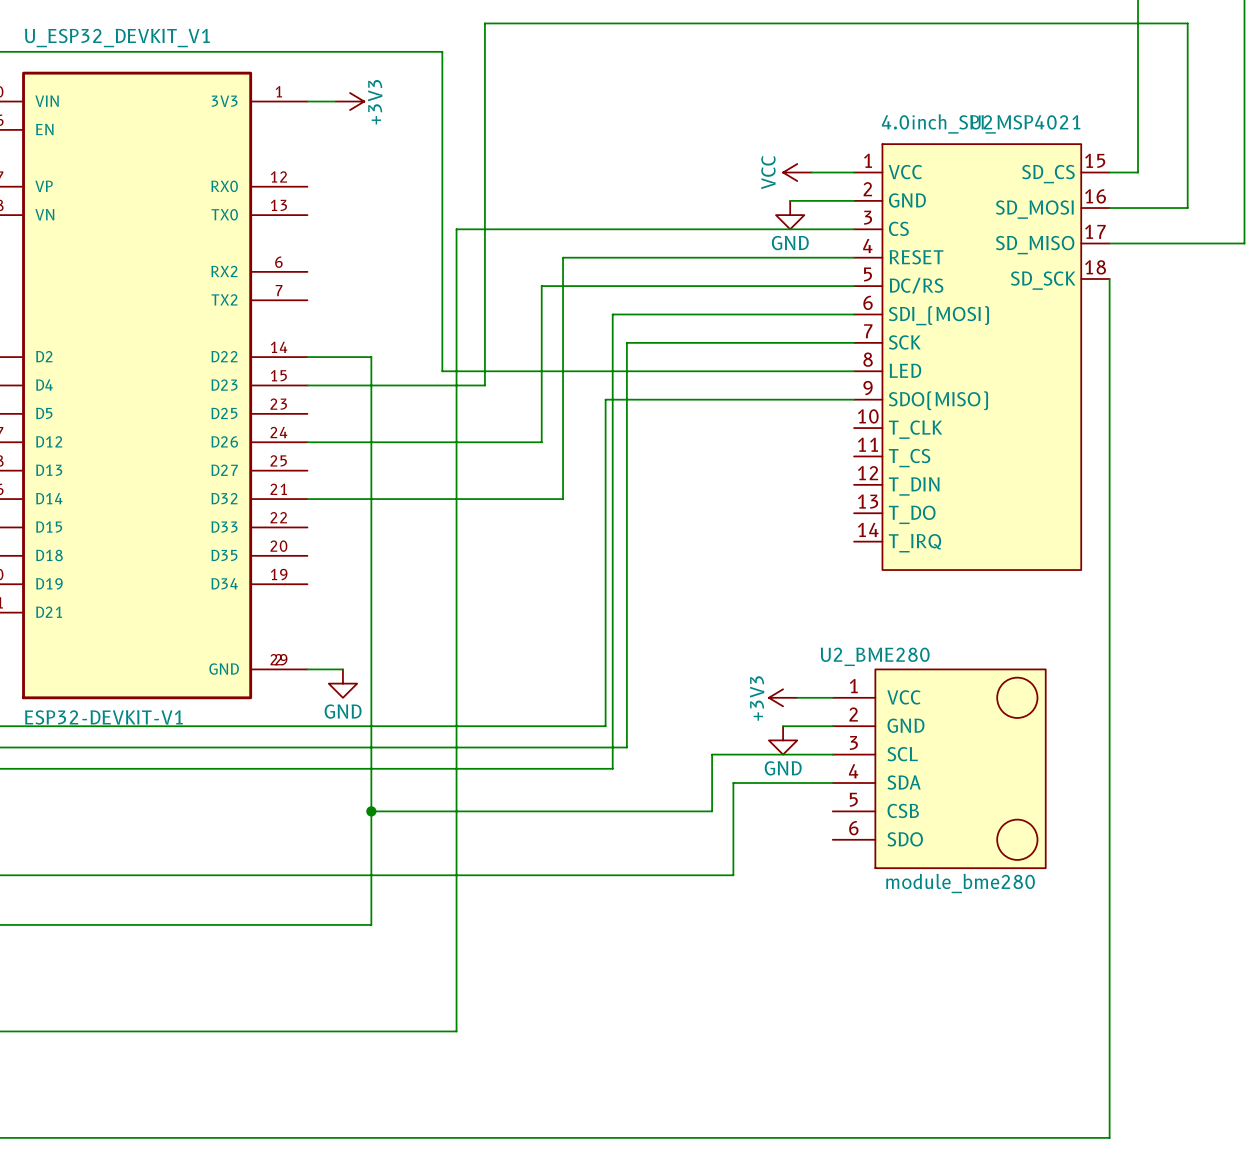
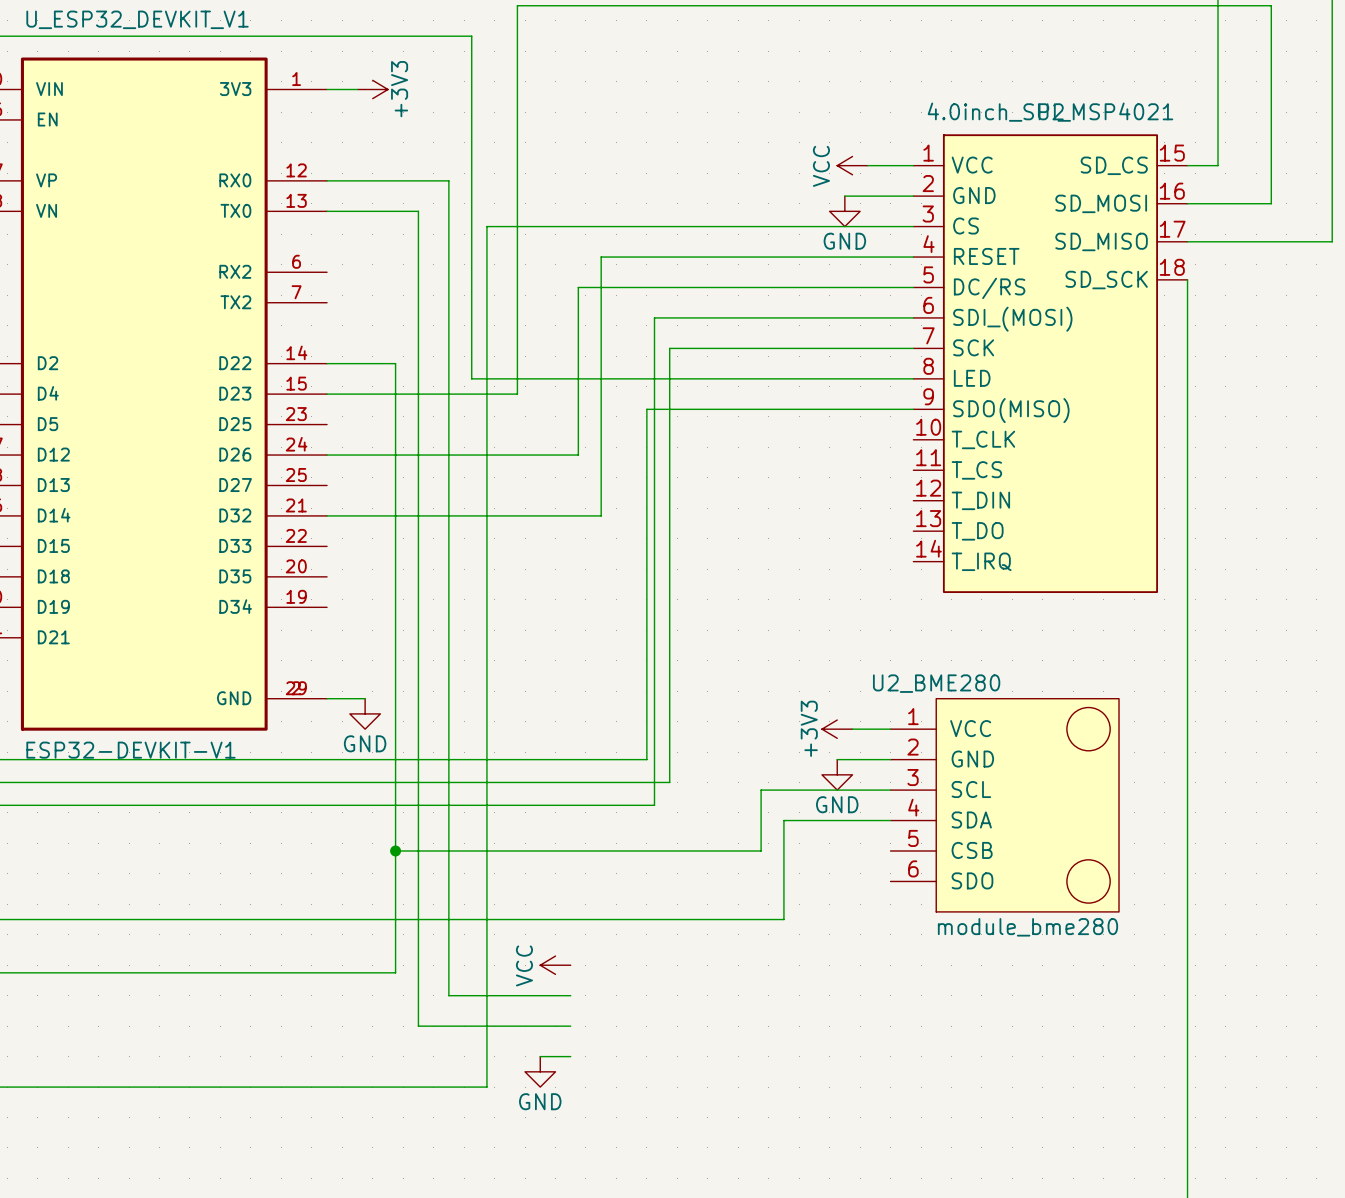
wire: none -> (327, 180) (448, 180) (448, 995) (570, 995)
wire: none -> (327, 211) (418, 211) (418, 1026) (570, 1026)
power symbol: none -> VCC (555, 965)
wire: none -> (540, 1056) (570, 1056)
power symbol: none -> GND (540, 1071)

